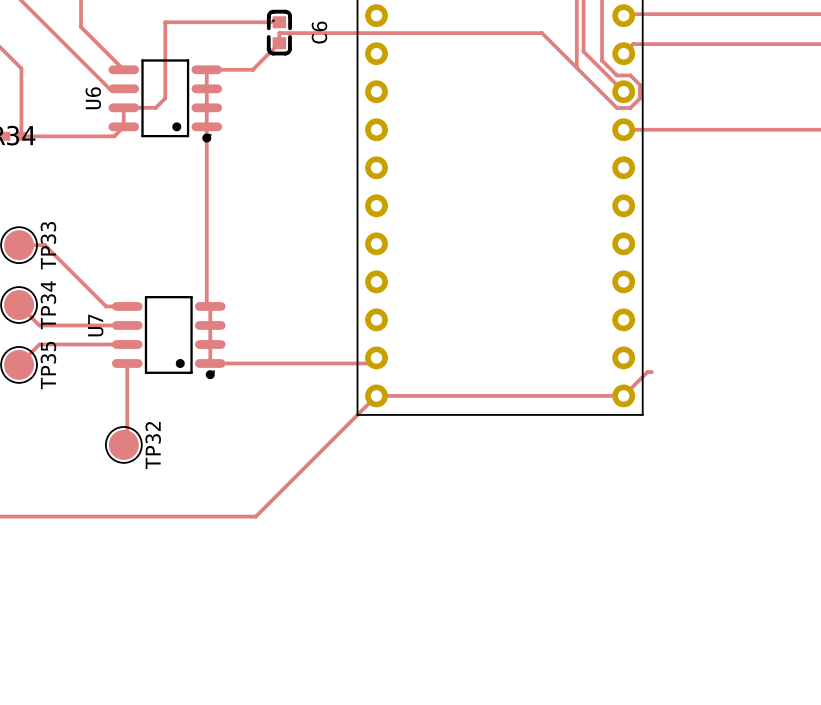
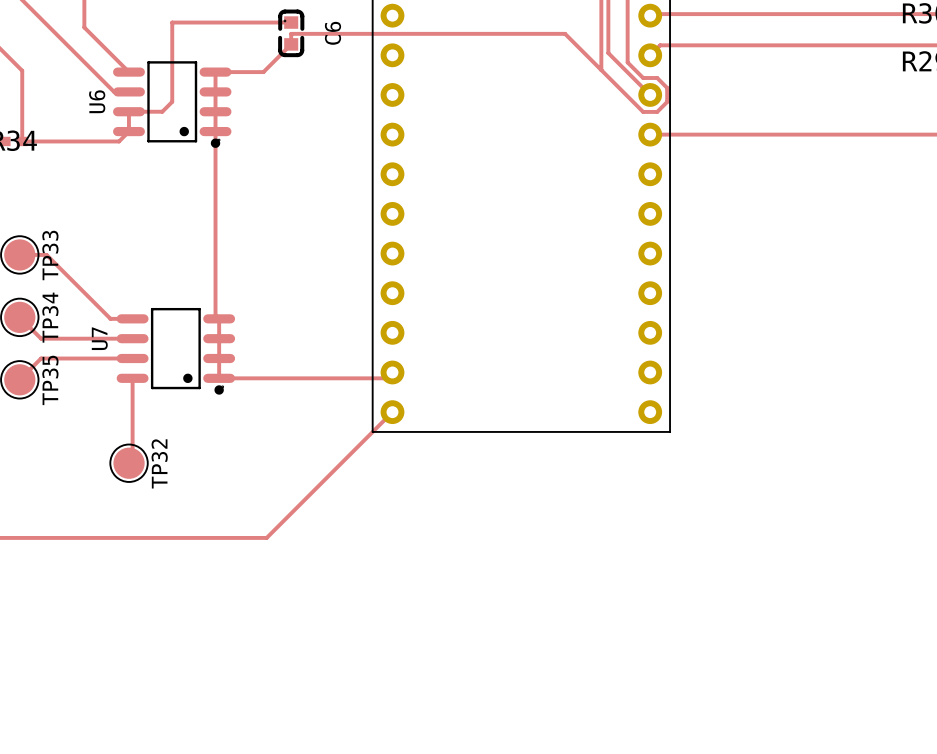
track: (652, 372) (647, 372) (623, 395) (376, 395) -> none

